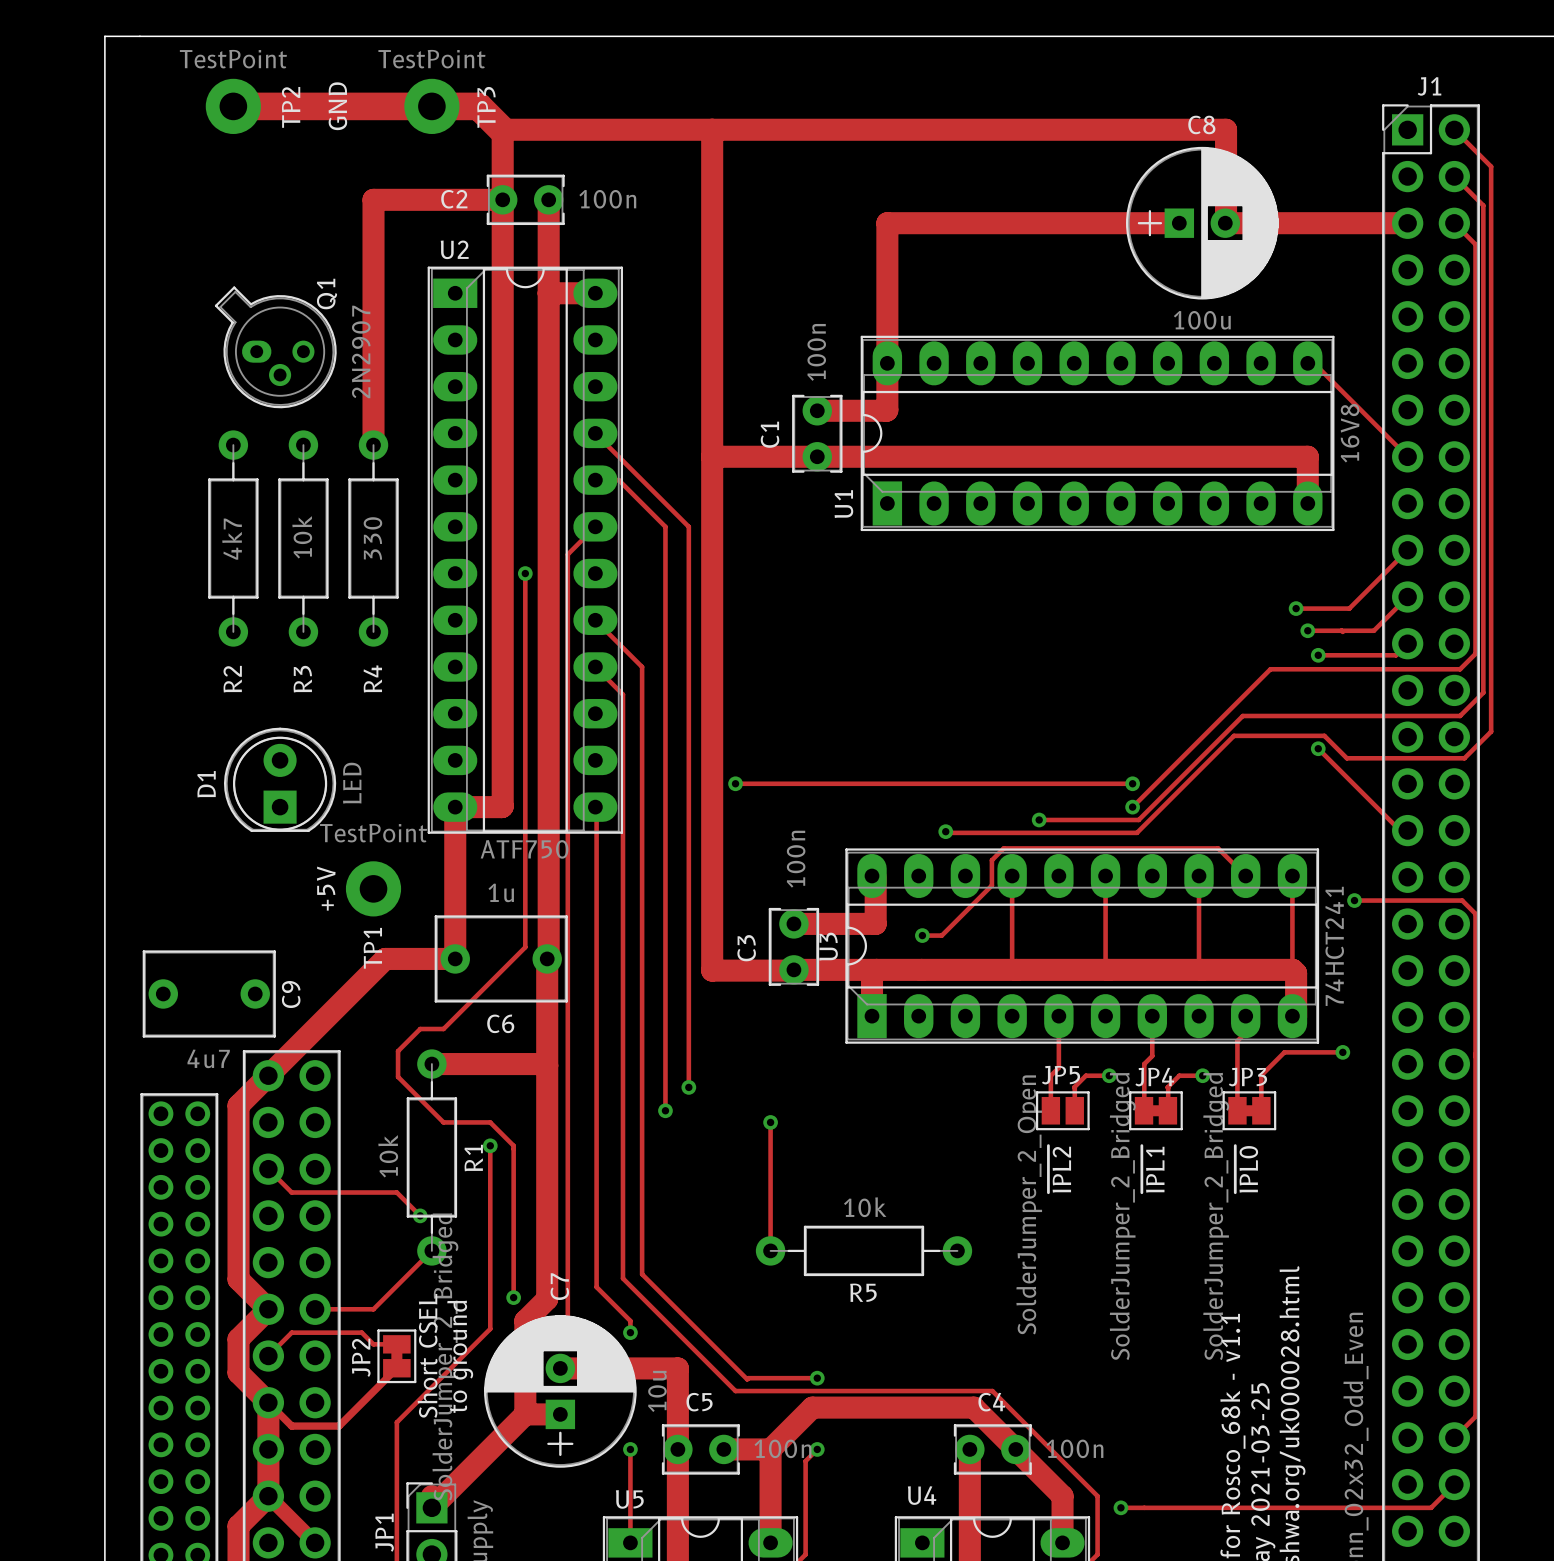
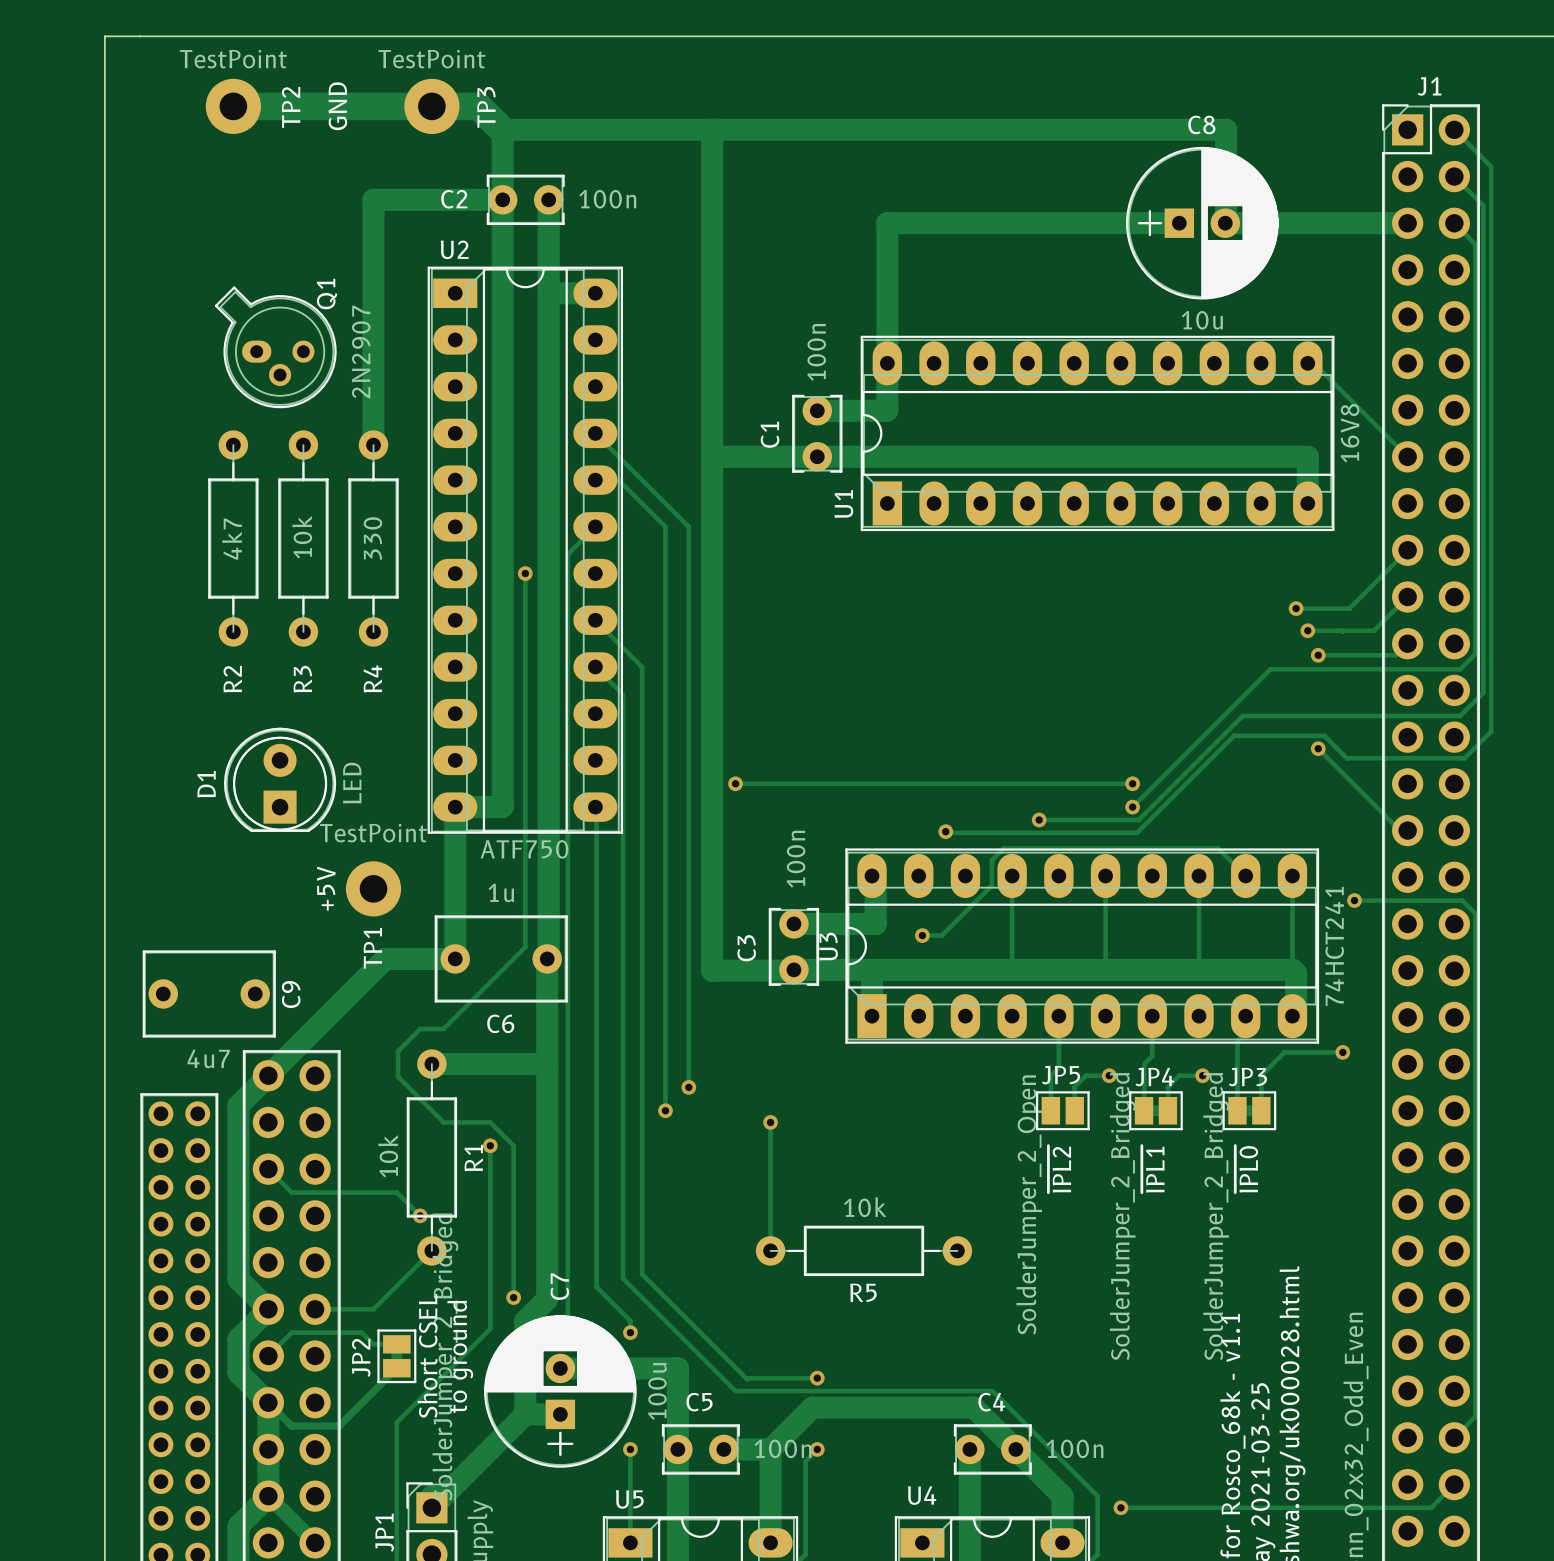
C8 value: 100u (1202, 320) -> 10u (1202, 320)
C7 value: 10u (657, 1391) -> 100u (657, 1391)

